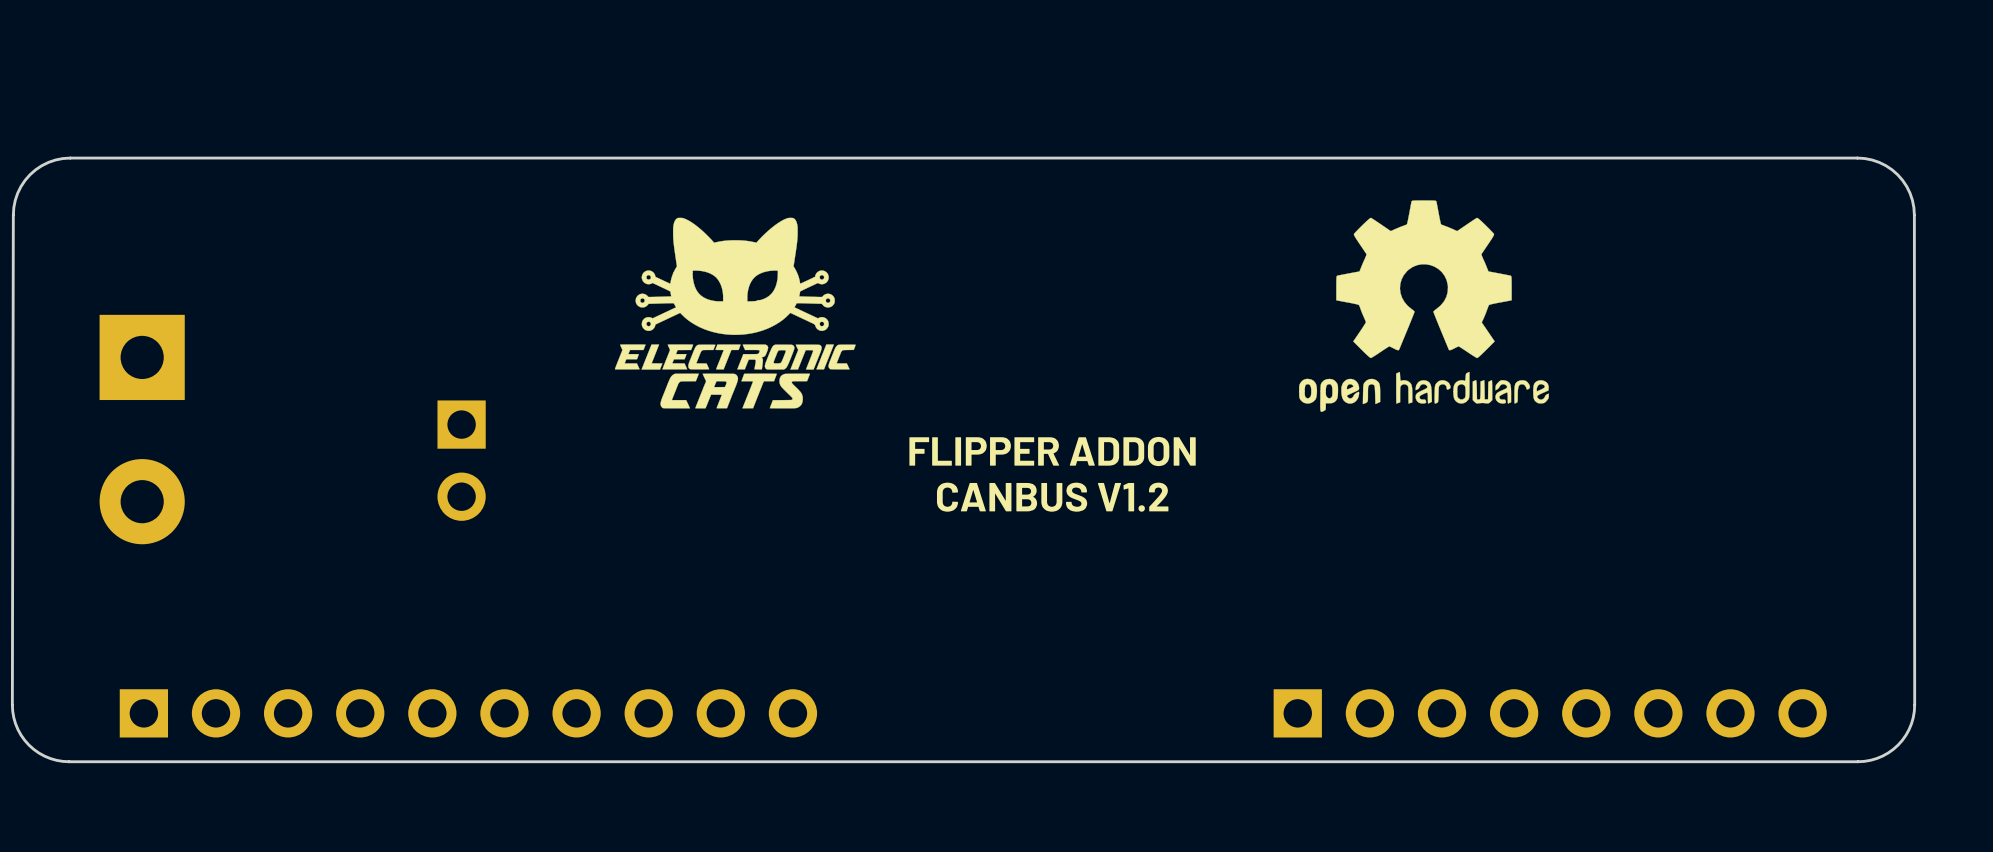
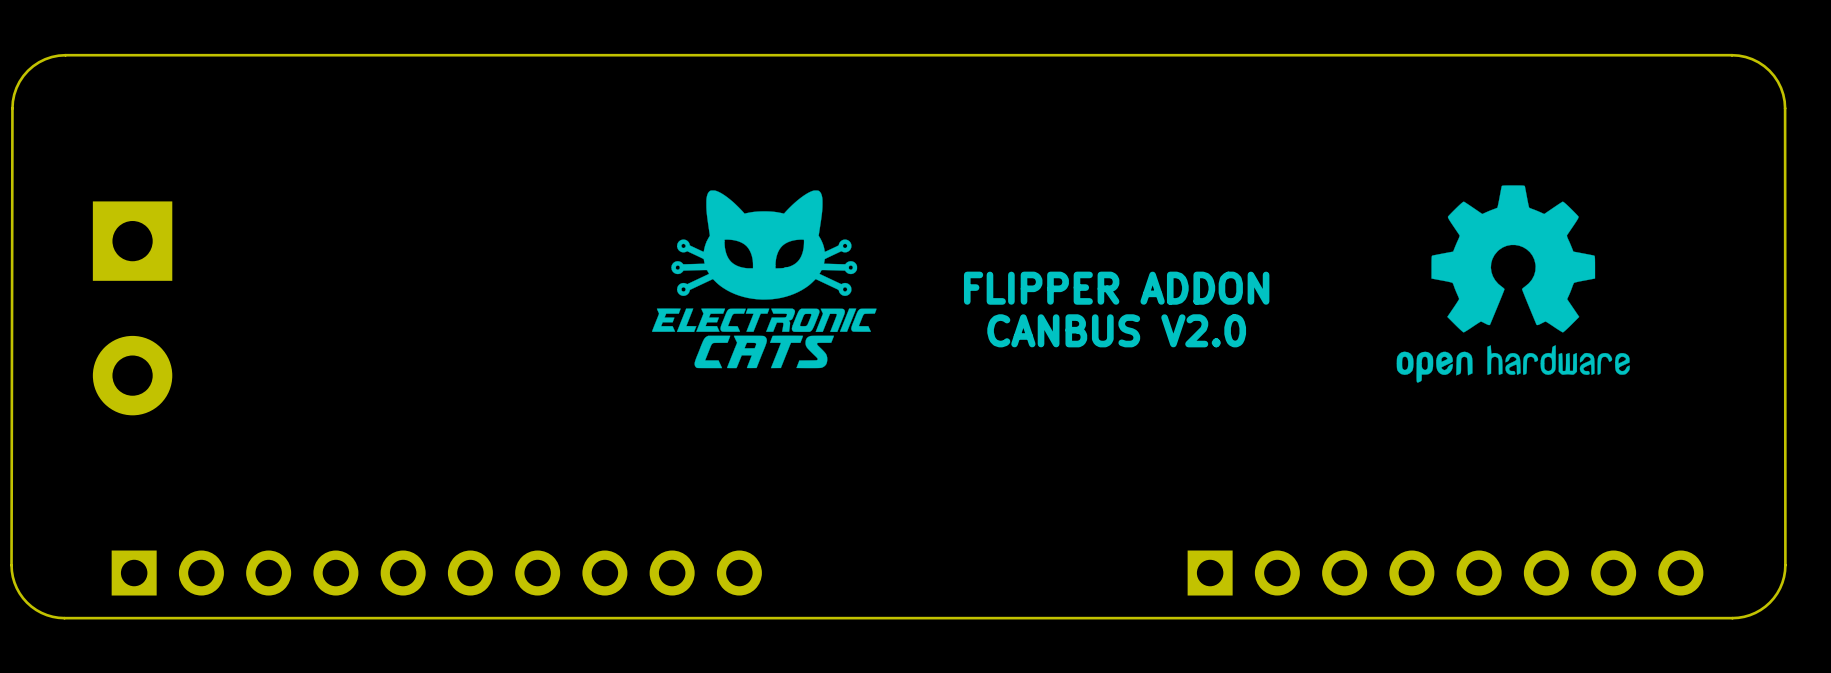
drawing position: (1423, 306) -> (1513, 283)
drawing position: (735, 313) -> (764, 279)
text position: FLIPPER ADDON (1052, 451) -> FLIPPER ADDON (1116, 288)
part: (461, 460) -> none
text: CANBUS V1.2 (1052, 497) -> CANBUS V2.0 (1116, 330)

